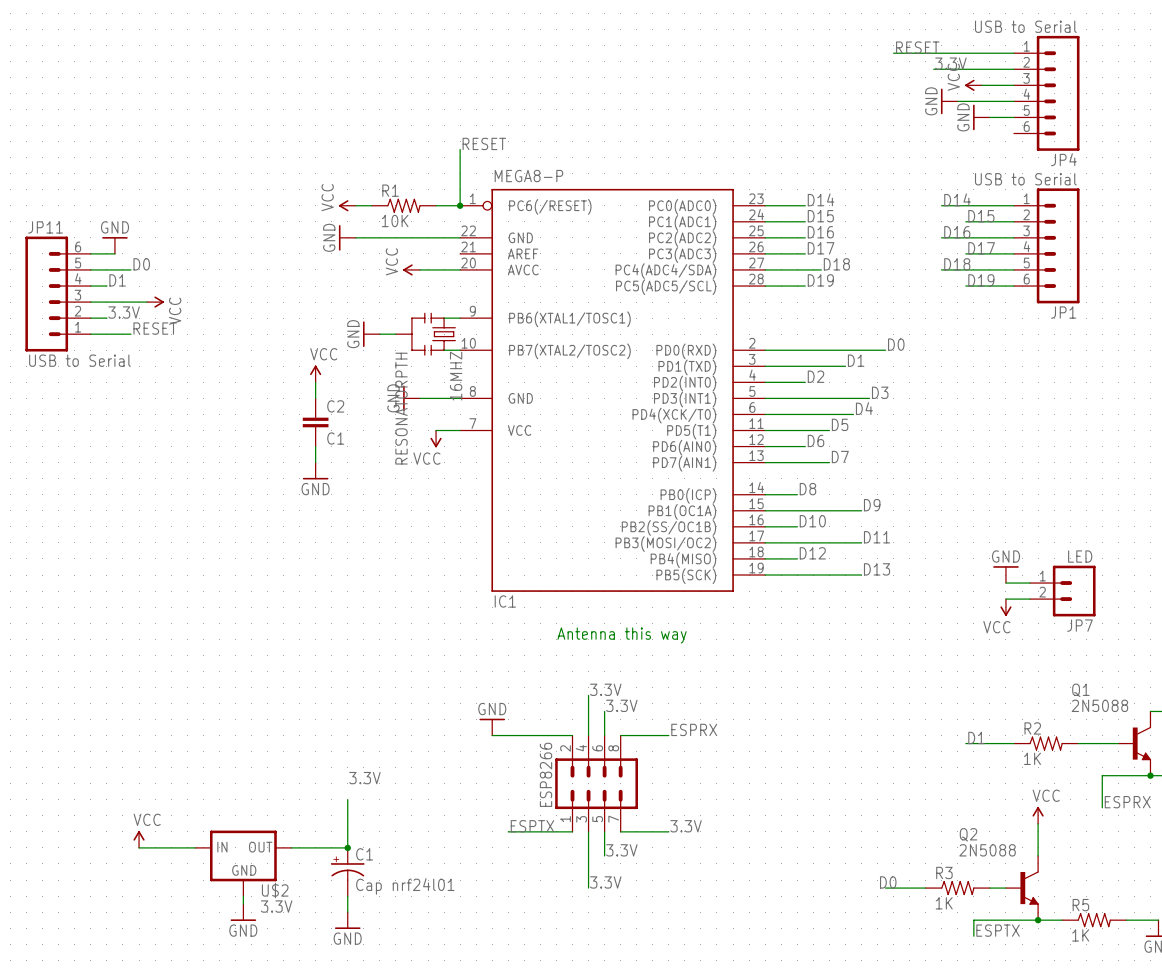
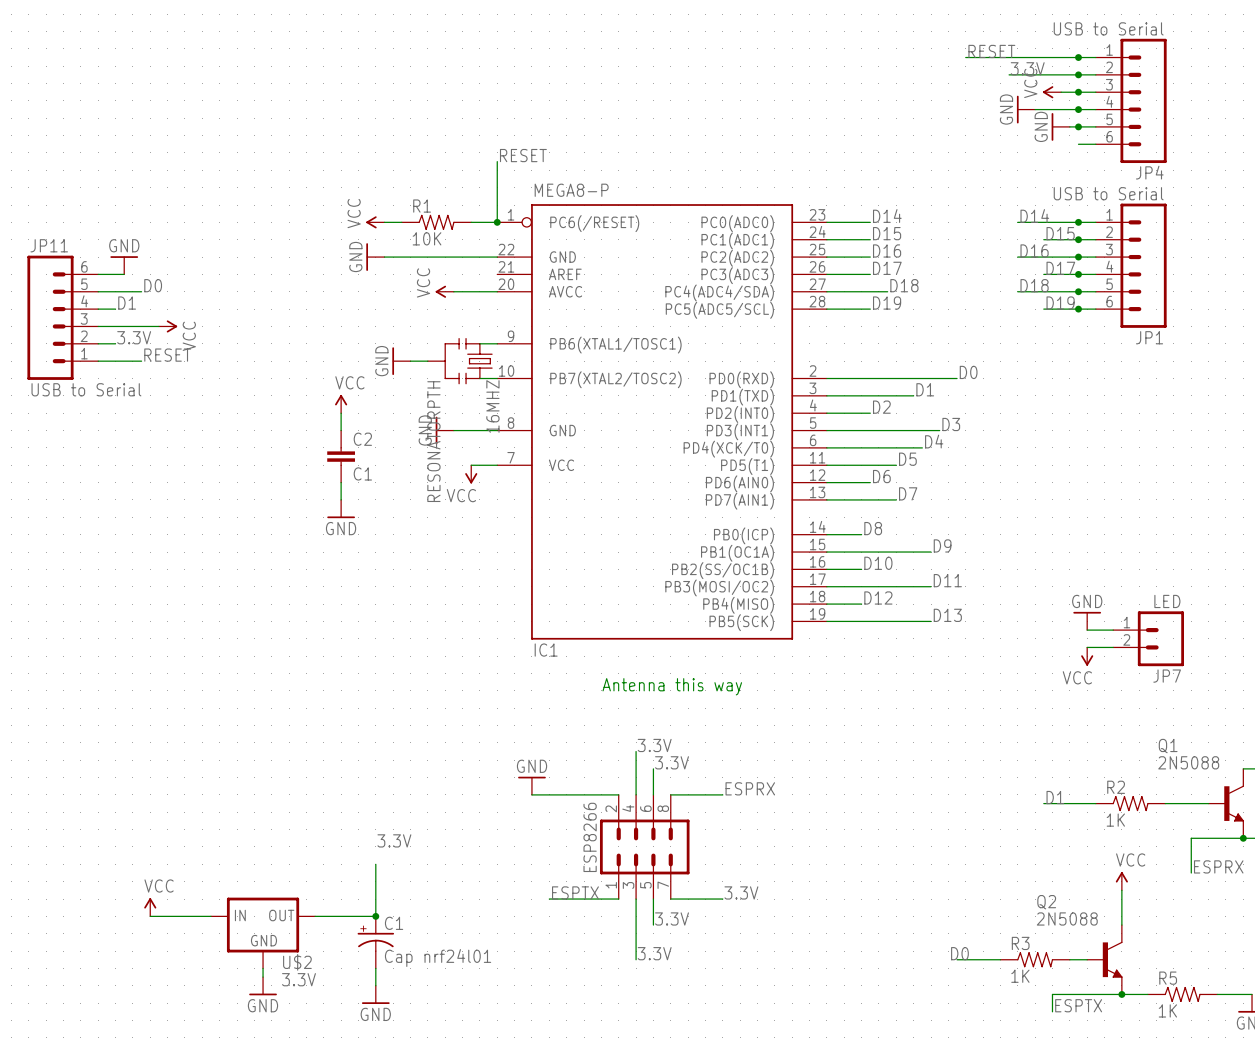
junction: none -> (1078, 57)
junction: none -> (1078, 74)
junction: none -> (1078, 92)
junction: none -> (1078, 109)
junction: none -> (1078, 126)
wire: none -> (1078, 144) (1095, 144)
junction: none -> (1078, 222)
junction: none -> (1078, 239)
junction: none -> (1078, 257)
junction: none -> (1078, 274)
junction: none -> (1078, 291)
junction: none -> (1078, 309)

